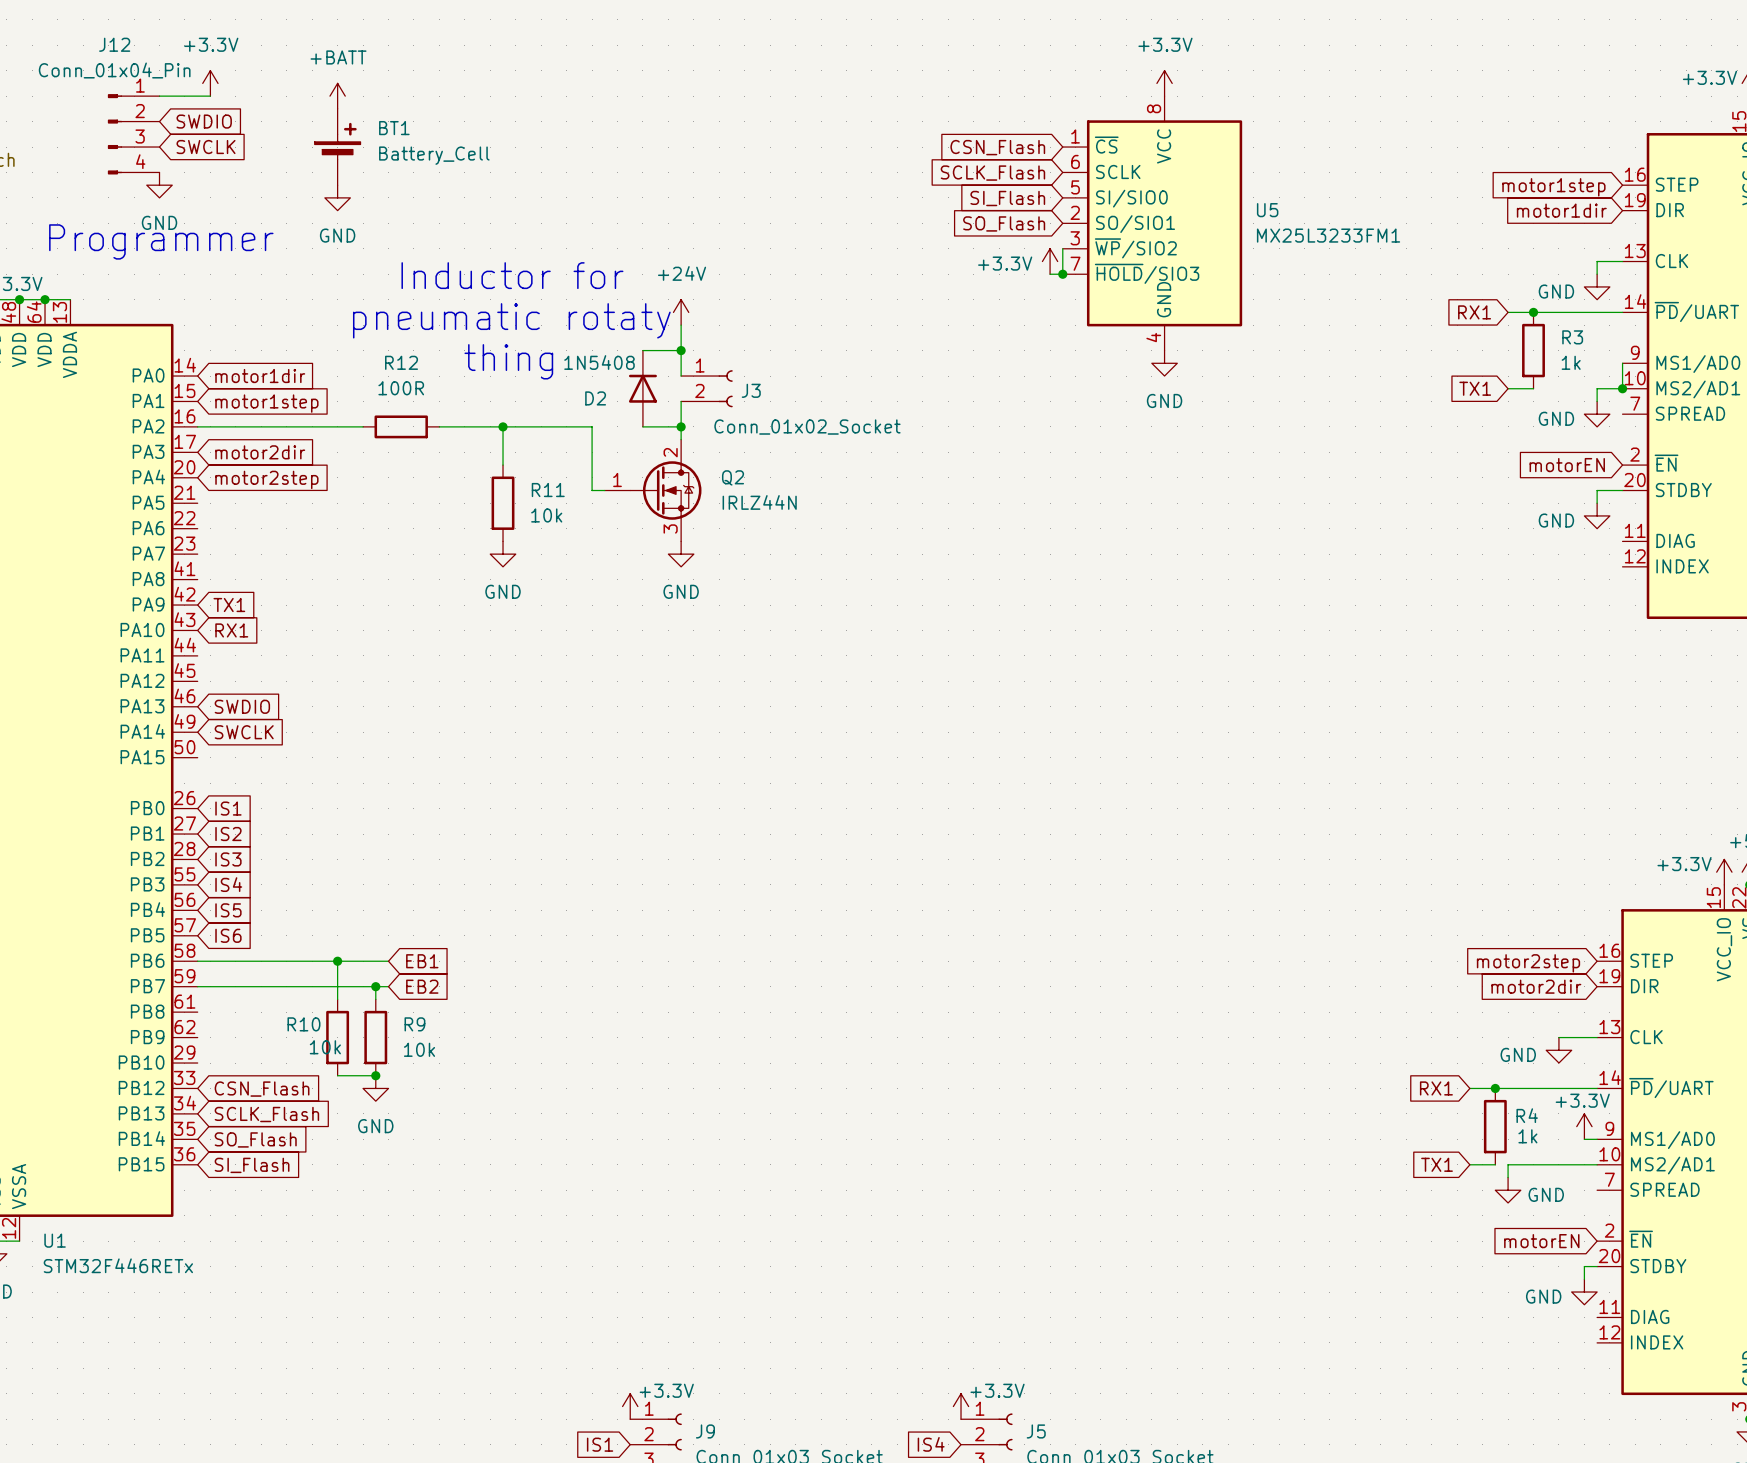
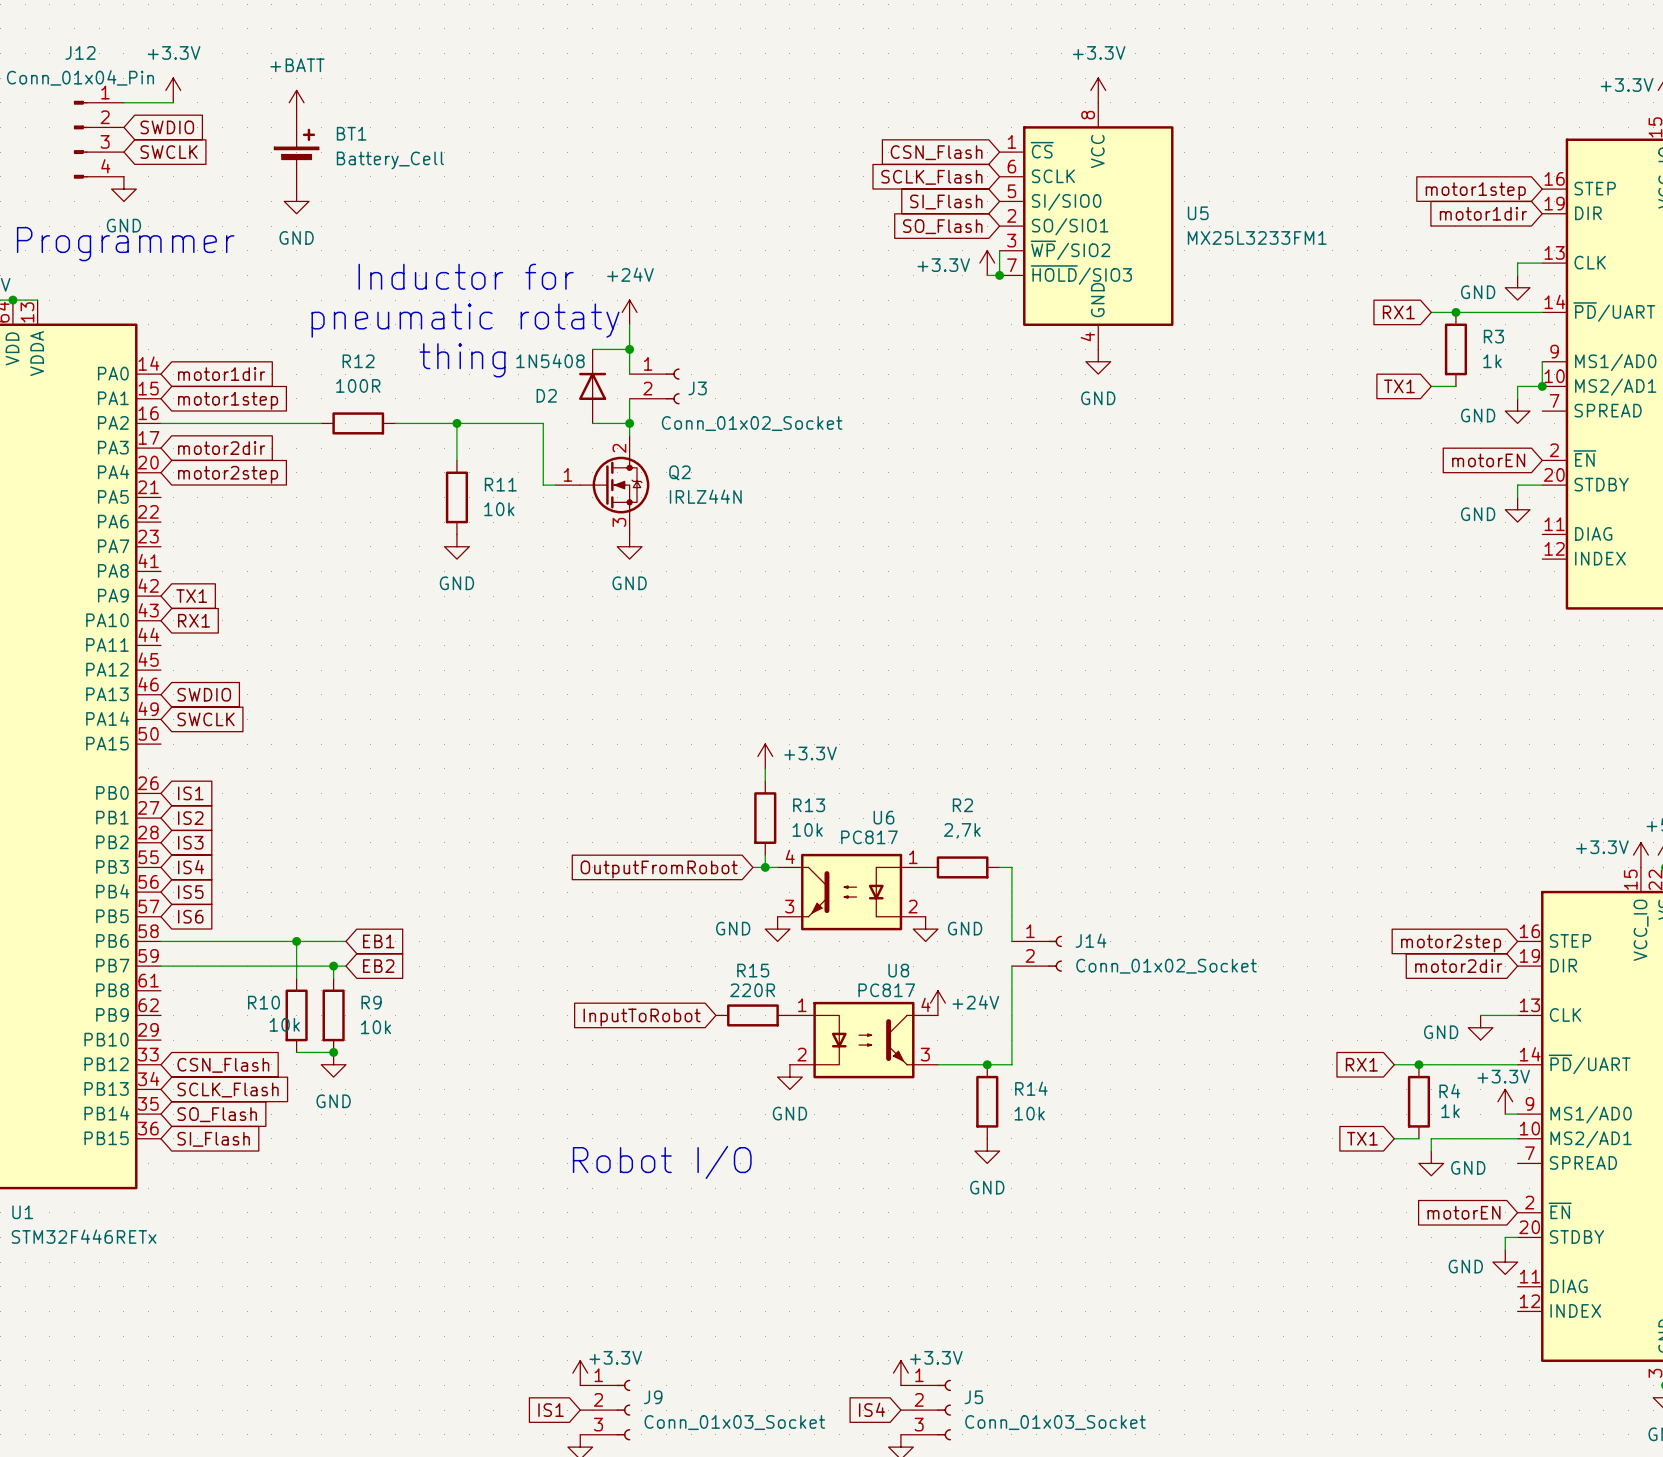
power symbol: none -> +3.3V (765, 756)
wire: none -> (765, 768) (765, 781)
R13: none -> 10k (765, 818)
wire: none -> (765, 855) (765, 867)
wire: none -> (752, 867) (777, 867)
junction: none -> (765, 867)
R2: none -> 2,7k (962, 867)
wire: none -> (999, 867) (1011, 867) (1011, 941)
global label: none -> OutputFromRobot (659, 869)
U6: none -> PC817 (851, 892)
power symbol: none -> GND (777, 929)
power symbol: none -> GND (925, 929)
J14: none -> Conn_01x02_Socket (1036, 953)
wire: none -> (1011, 966) (1011, 1064) (937, 1064)
power symbol: none -> +24V (937, 1003)
R15: none -> 220R (752, 1015)
global label: none -> InputToRobot (642, 1017)
U8: none -> PC817 (863, 1040)
junction: none -> (987, 1064)
power symbol: none -> GND (789, 1077)
R14: none -> 10k (987, 1101)
power symbol: none -> GND (987, 1151)
text: none -> Robot I/O (662, 1162)

